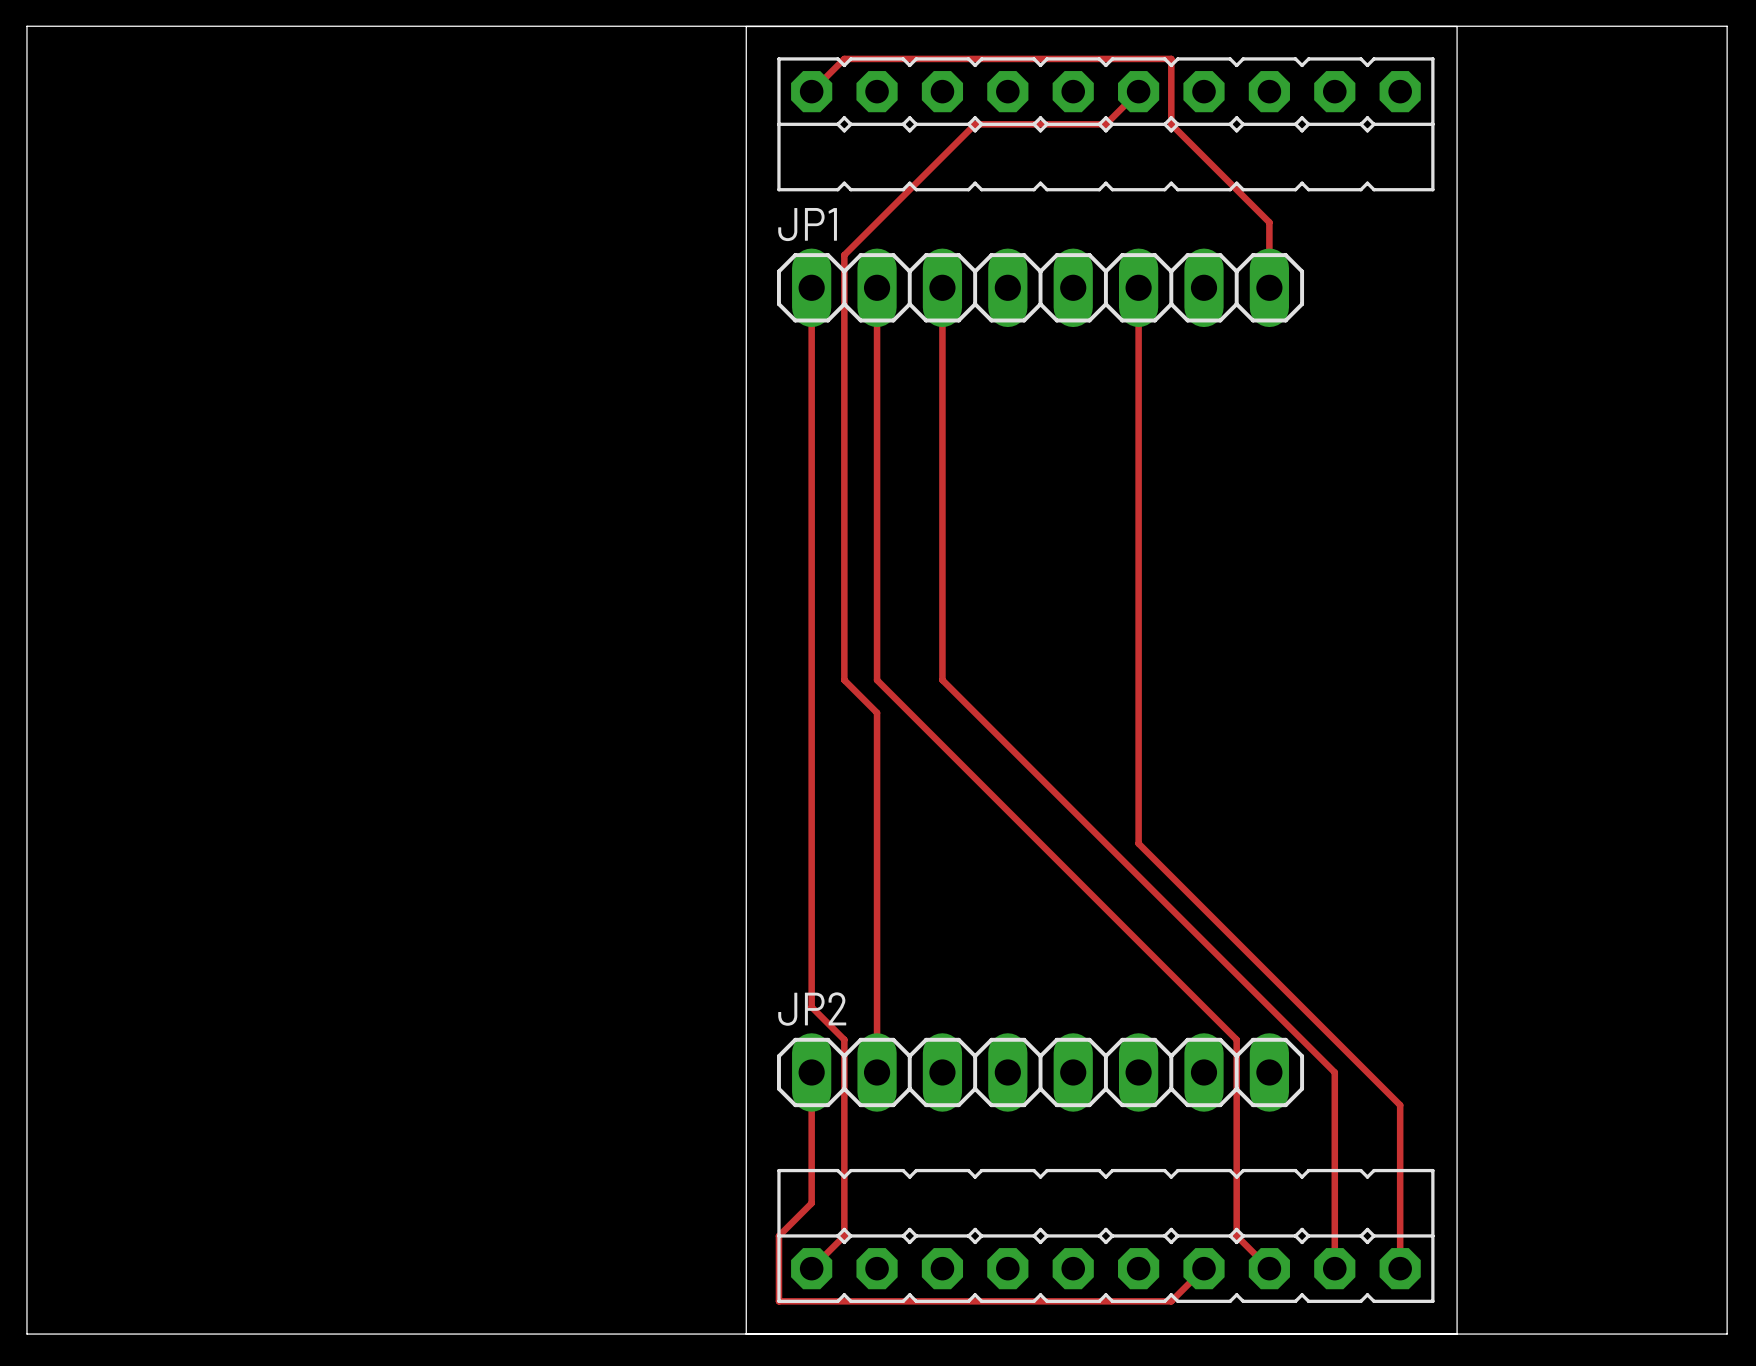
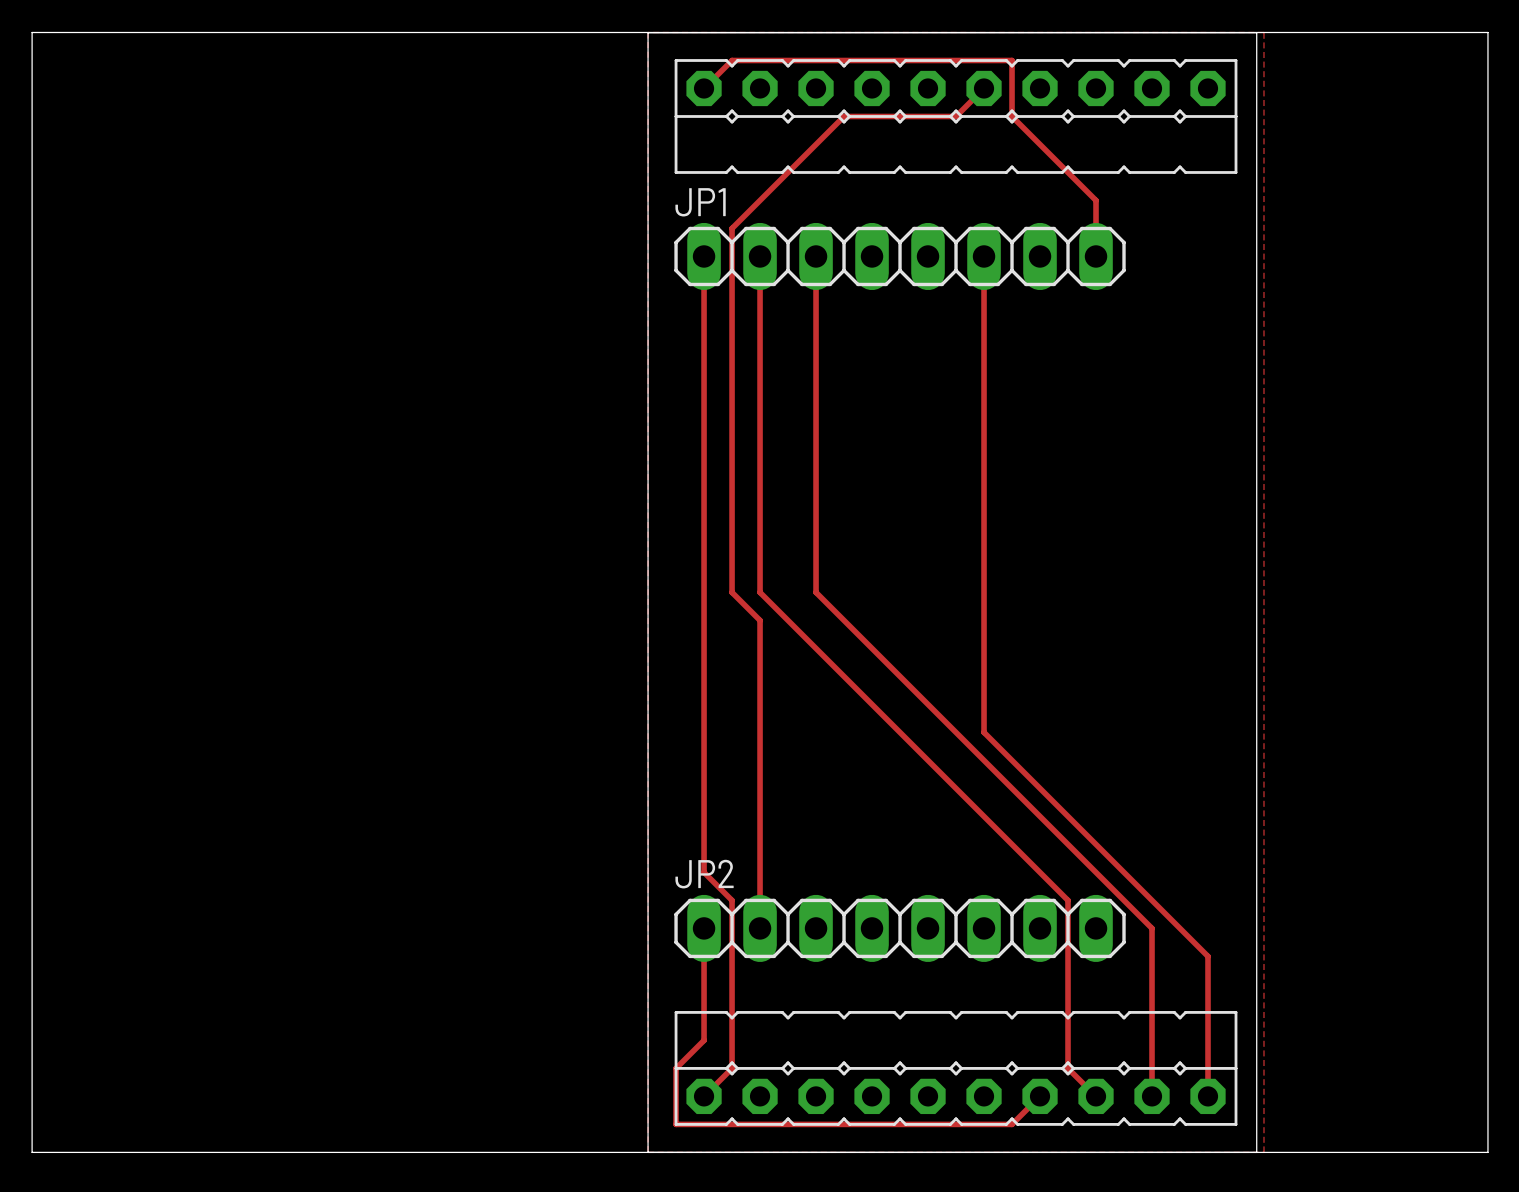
top zone outline: none -> (648, 32) (648, 1152) (1263, 1152) (1263, 32) (648, 32)

